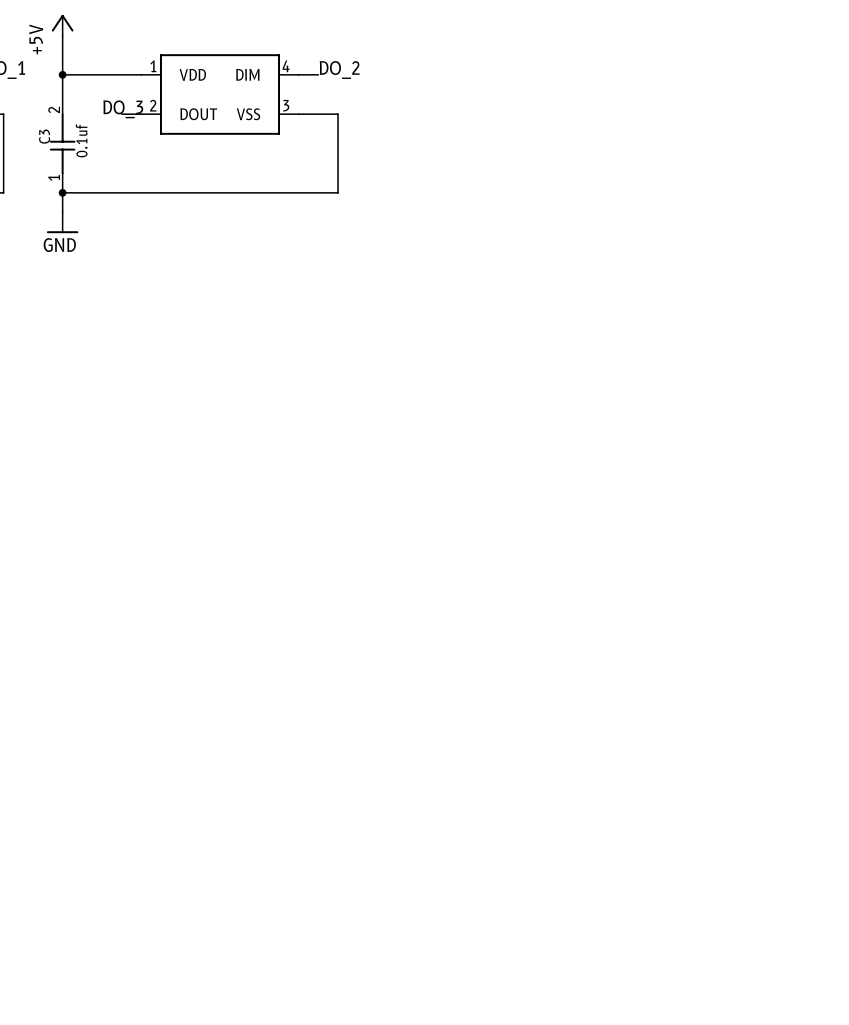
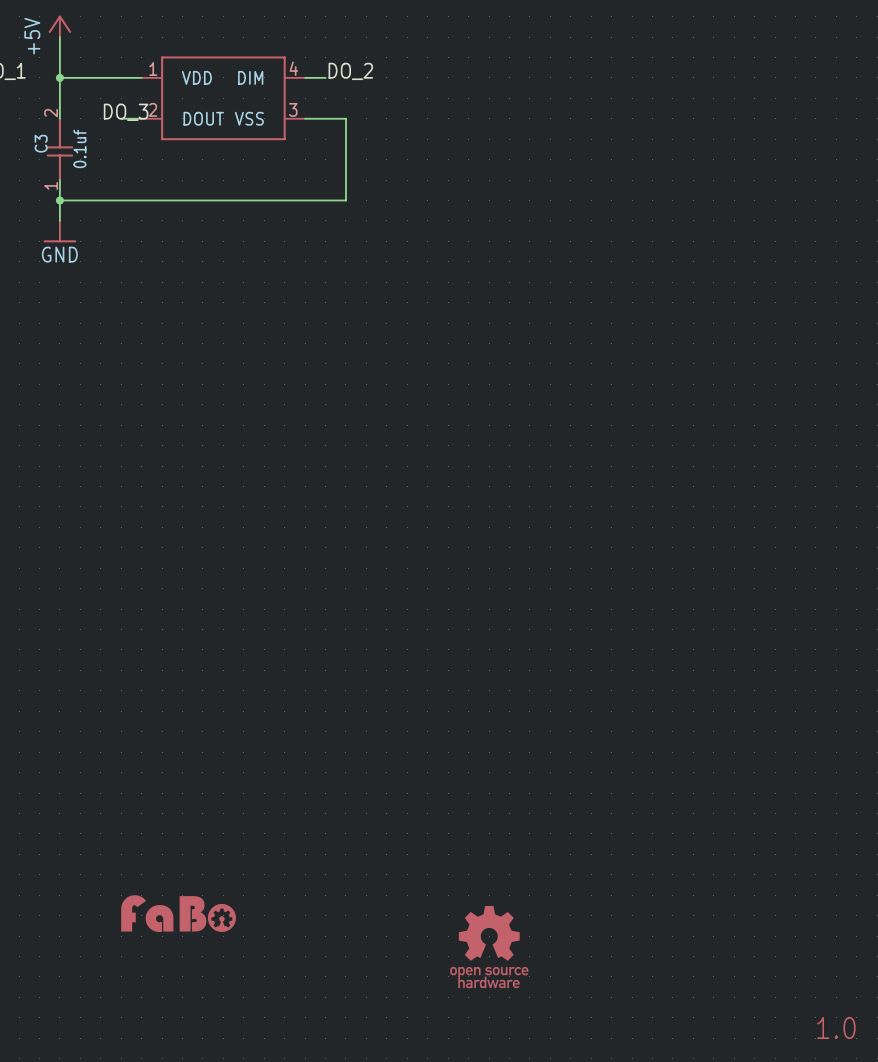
part: none -> (178, 913)
part: none -> (489, 947)
text: none -> 1.0 (836, 1027)

